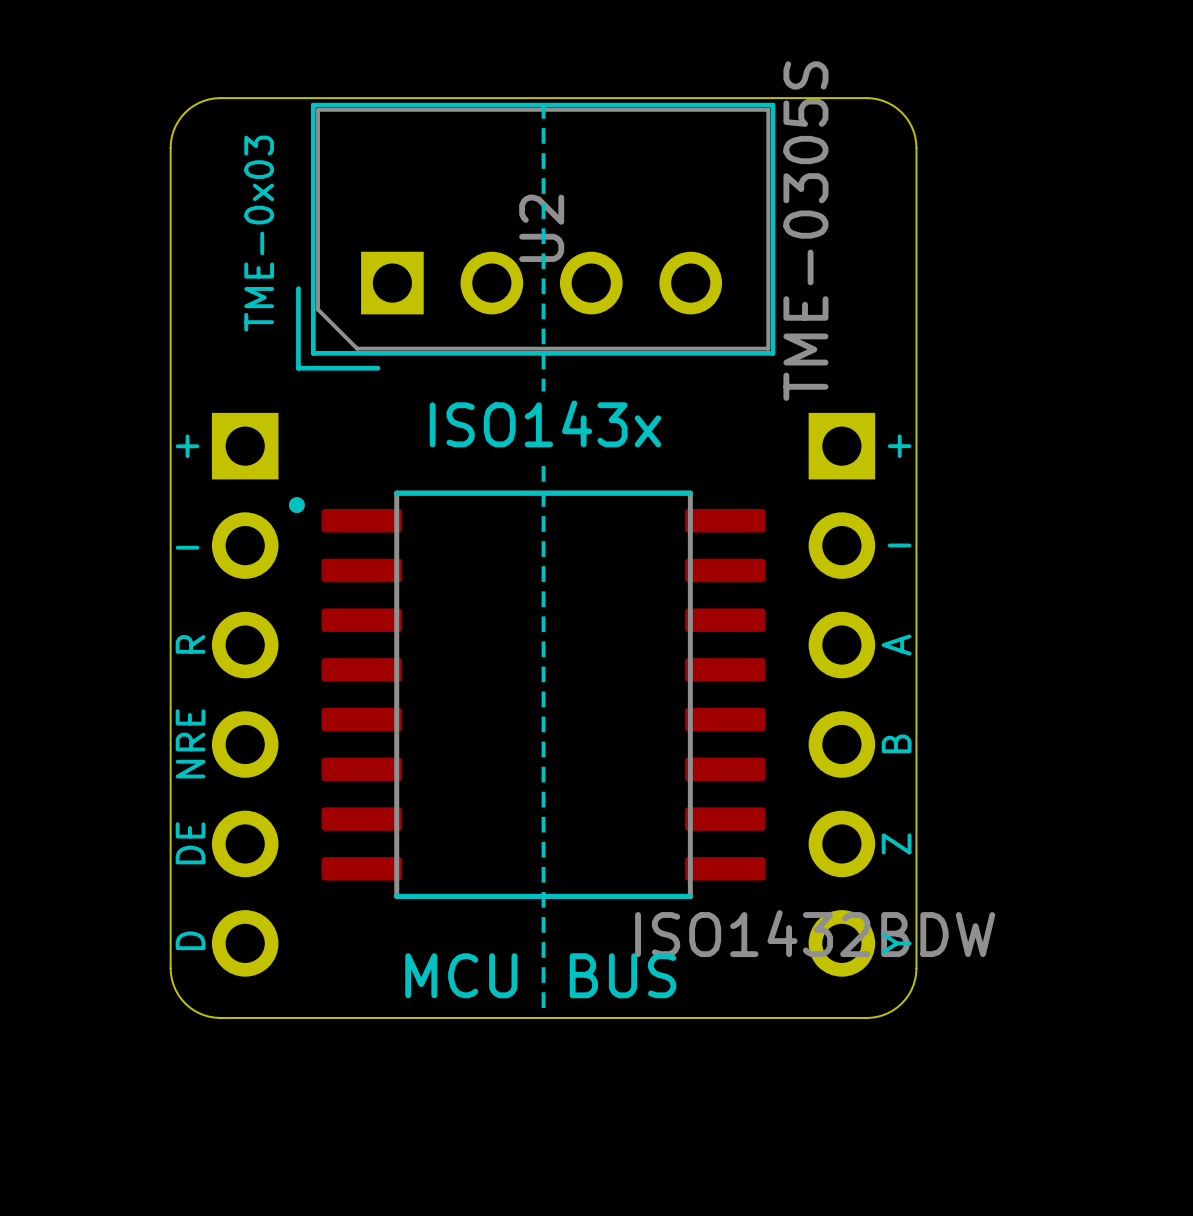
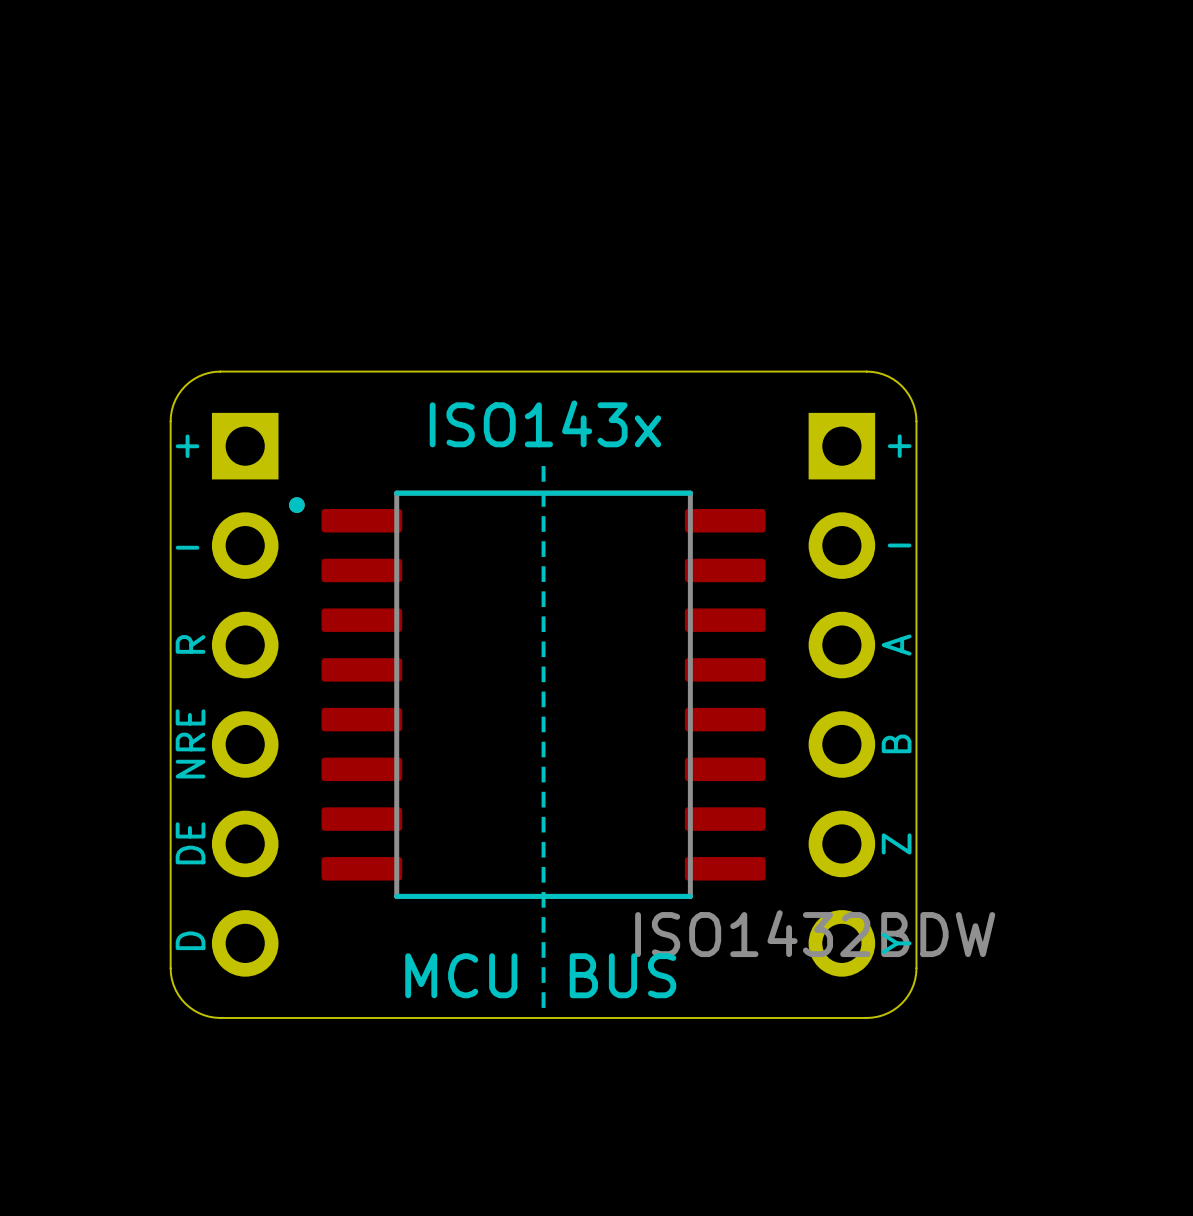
line: (543, 103) (543, 391) -> none
text: TME-0x03 (259, 233) -> none
U2: TME-0305S (535, 236) -> none
board edge: (170, 421) (170, 142) (175, 126) (185, 112) (198, 103) (220, 98) (866, 98) (888, 103) (897, 108) (908, 121) (916, 142) (916, 421) -> (170, 421) (173, 404) (185, 386) (198, 376) (220, 371) (872, 371) (888, 376) (905, 390) (913, 404) (916, 421)

